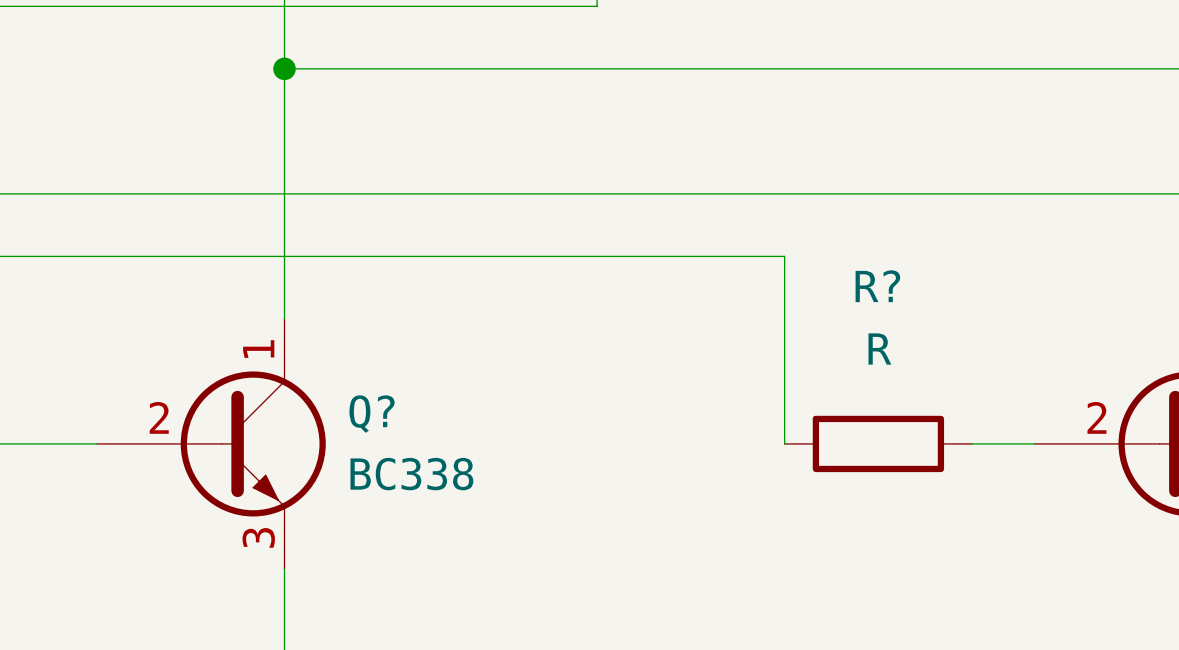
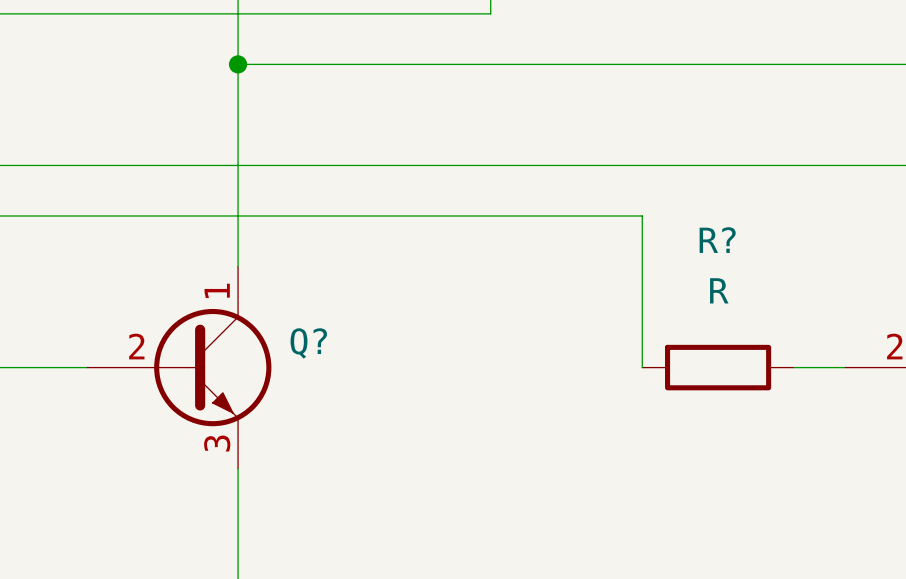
Q? value: BC338 (411, 474) -> none

